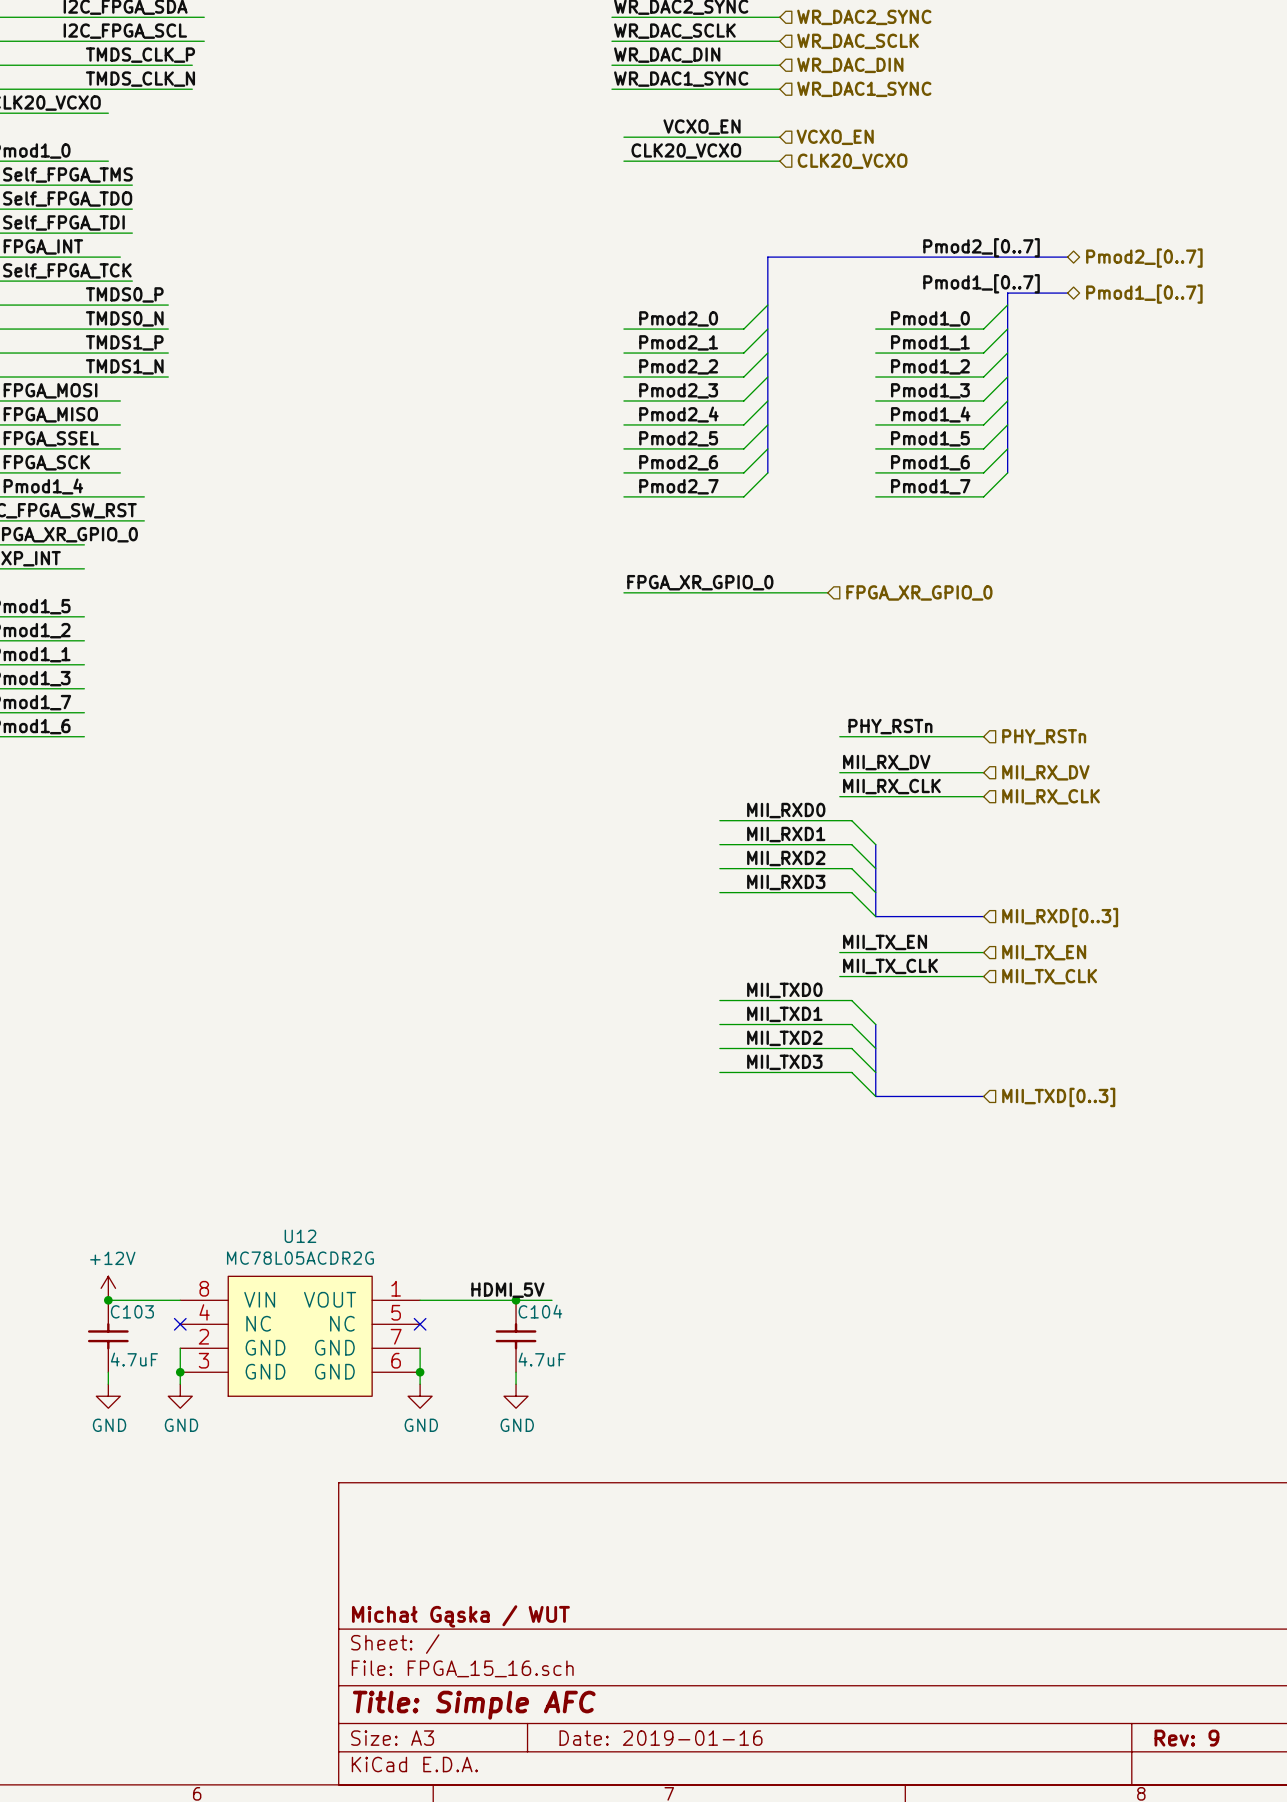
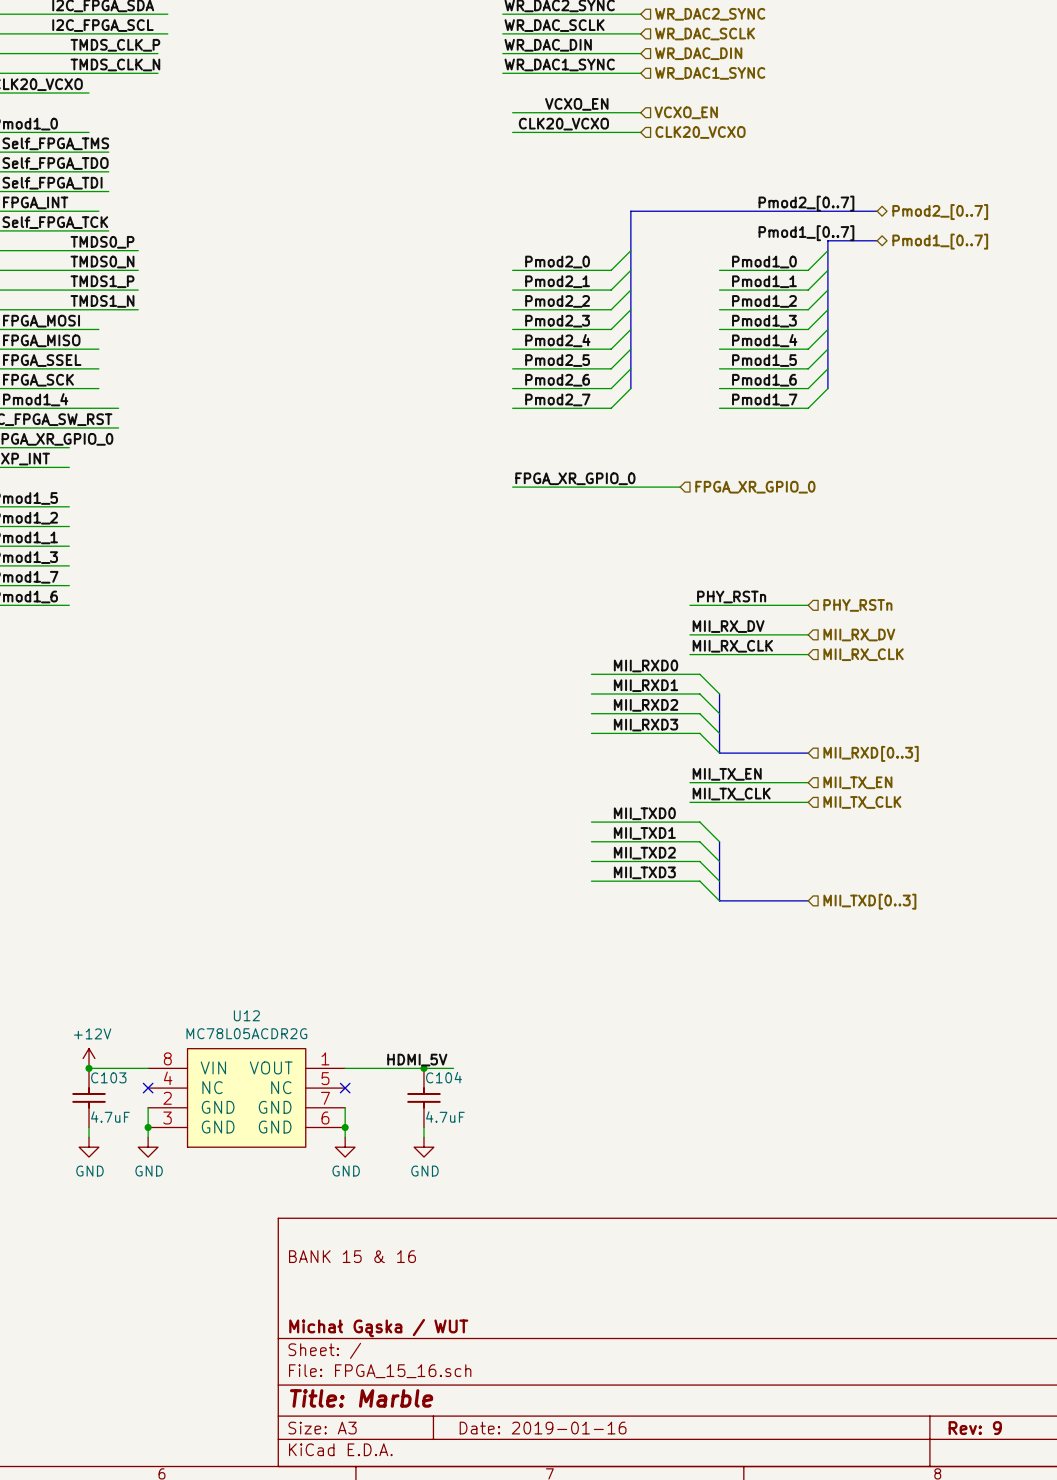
title block: none -> BANK 15 & 16 (352, 1256)
title block: Title: Simple AFC (474, 1705) -> Title: Marble (361, 1398)

